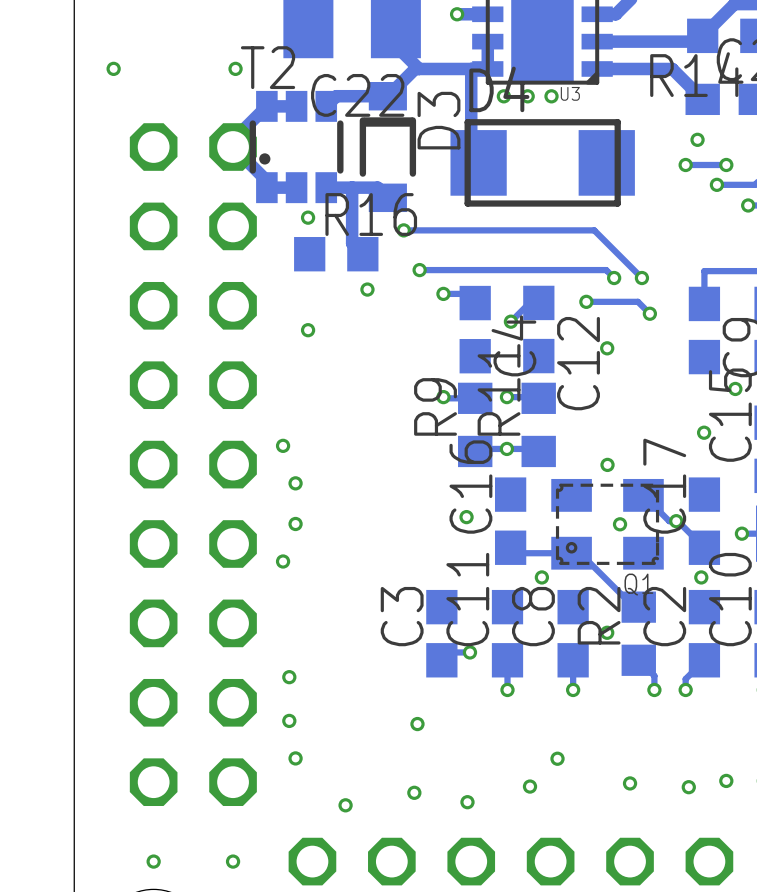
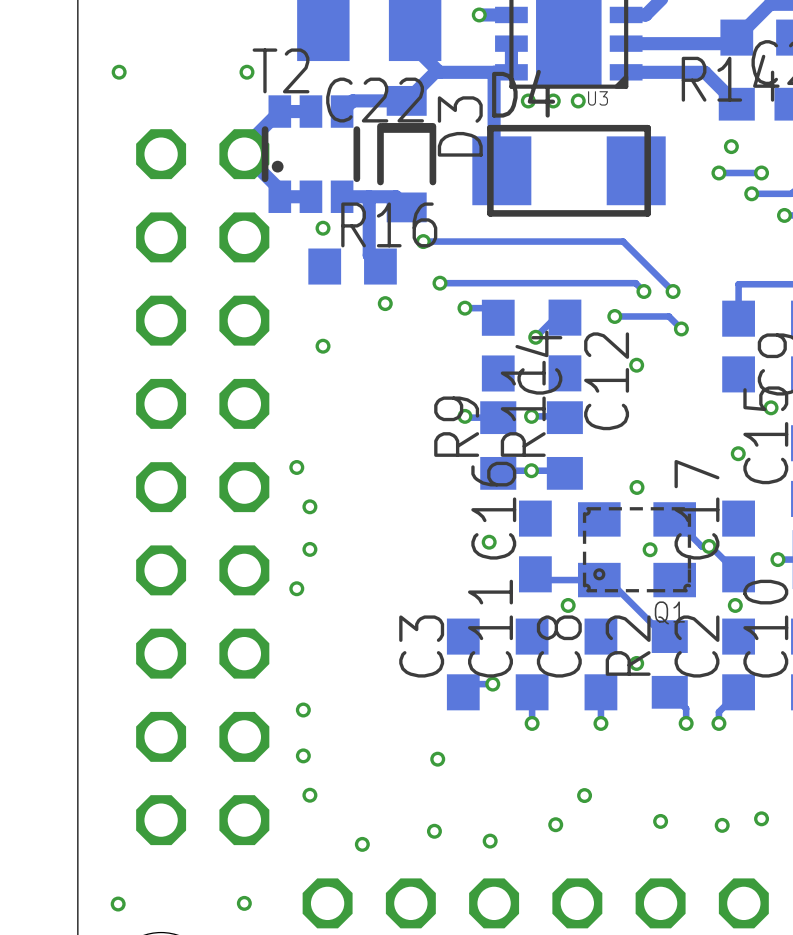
via position: (153, 861) -> (118, 904)

